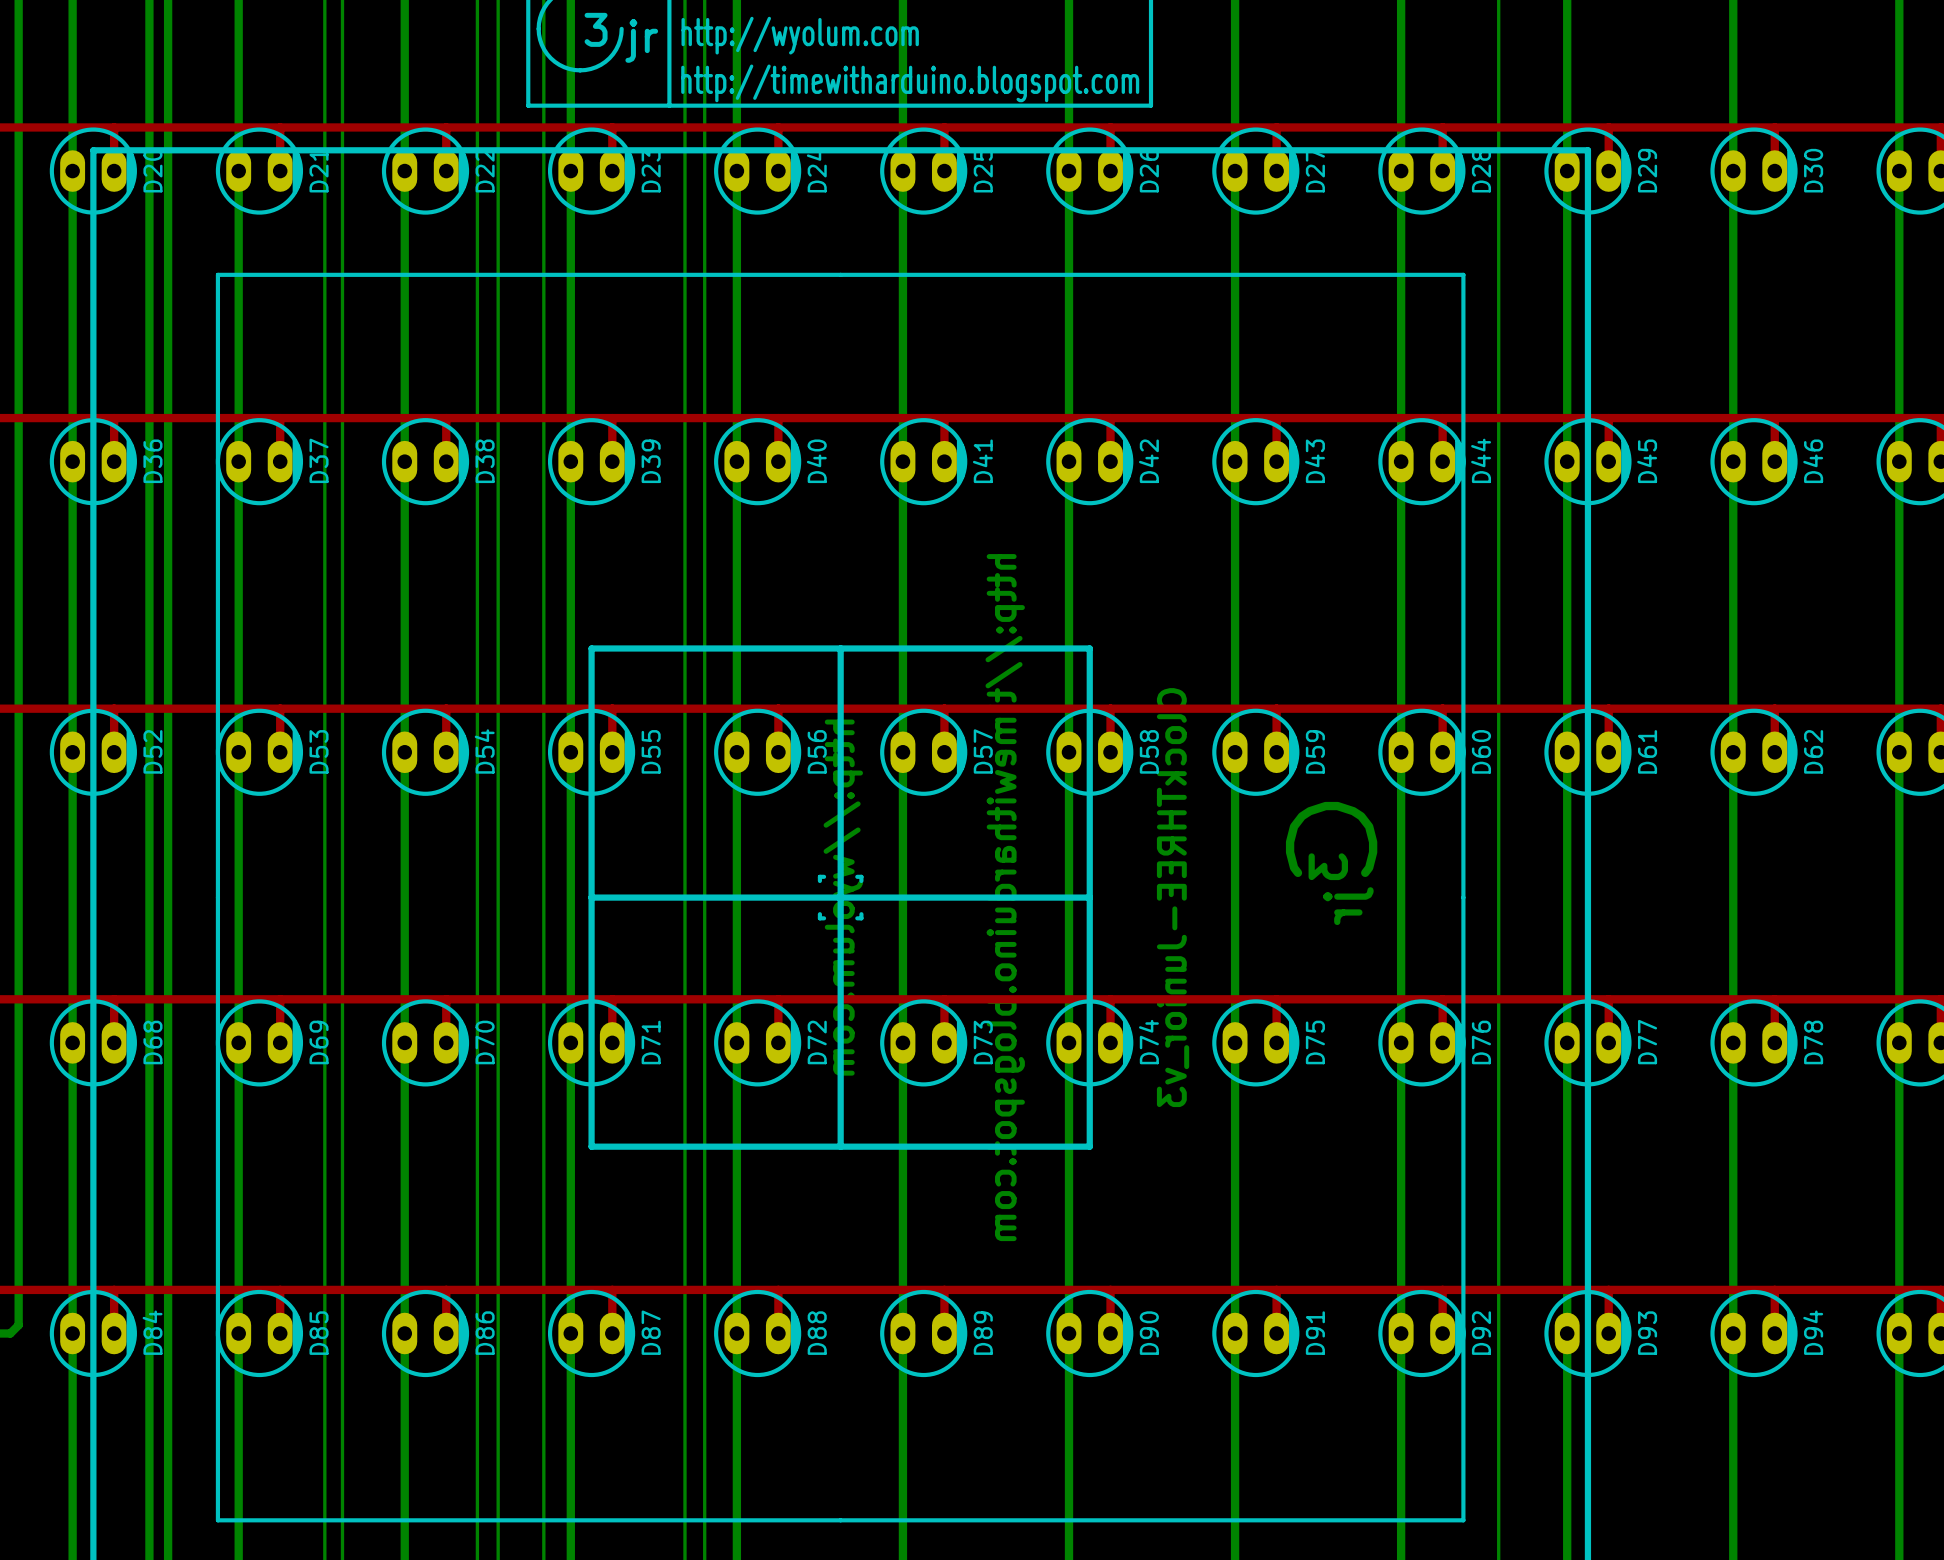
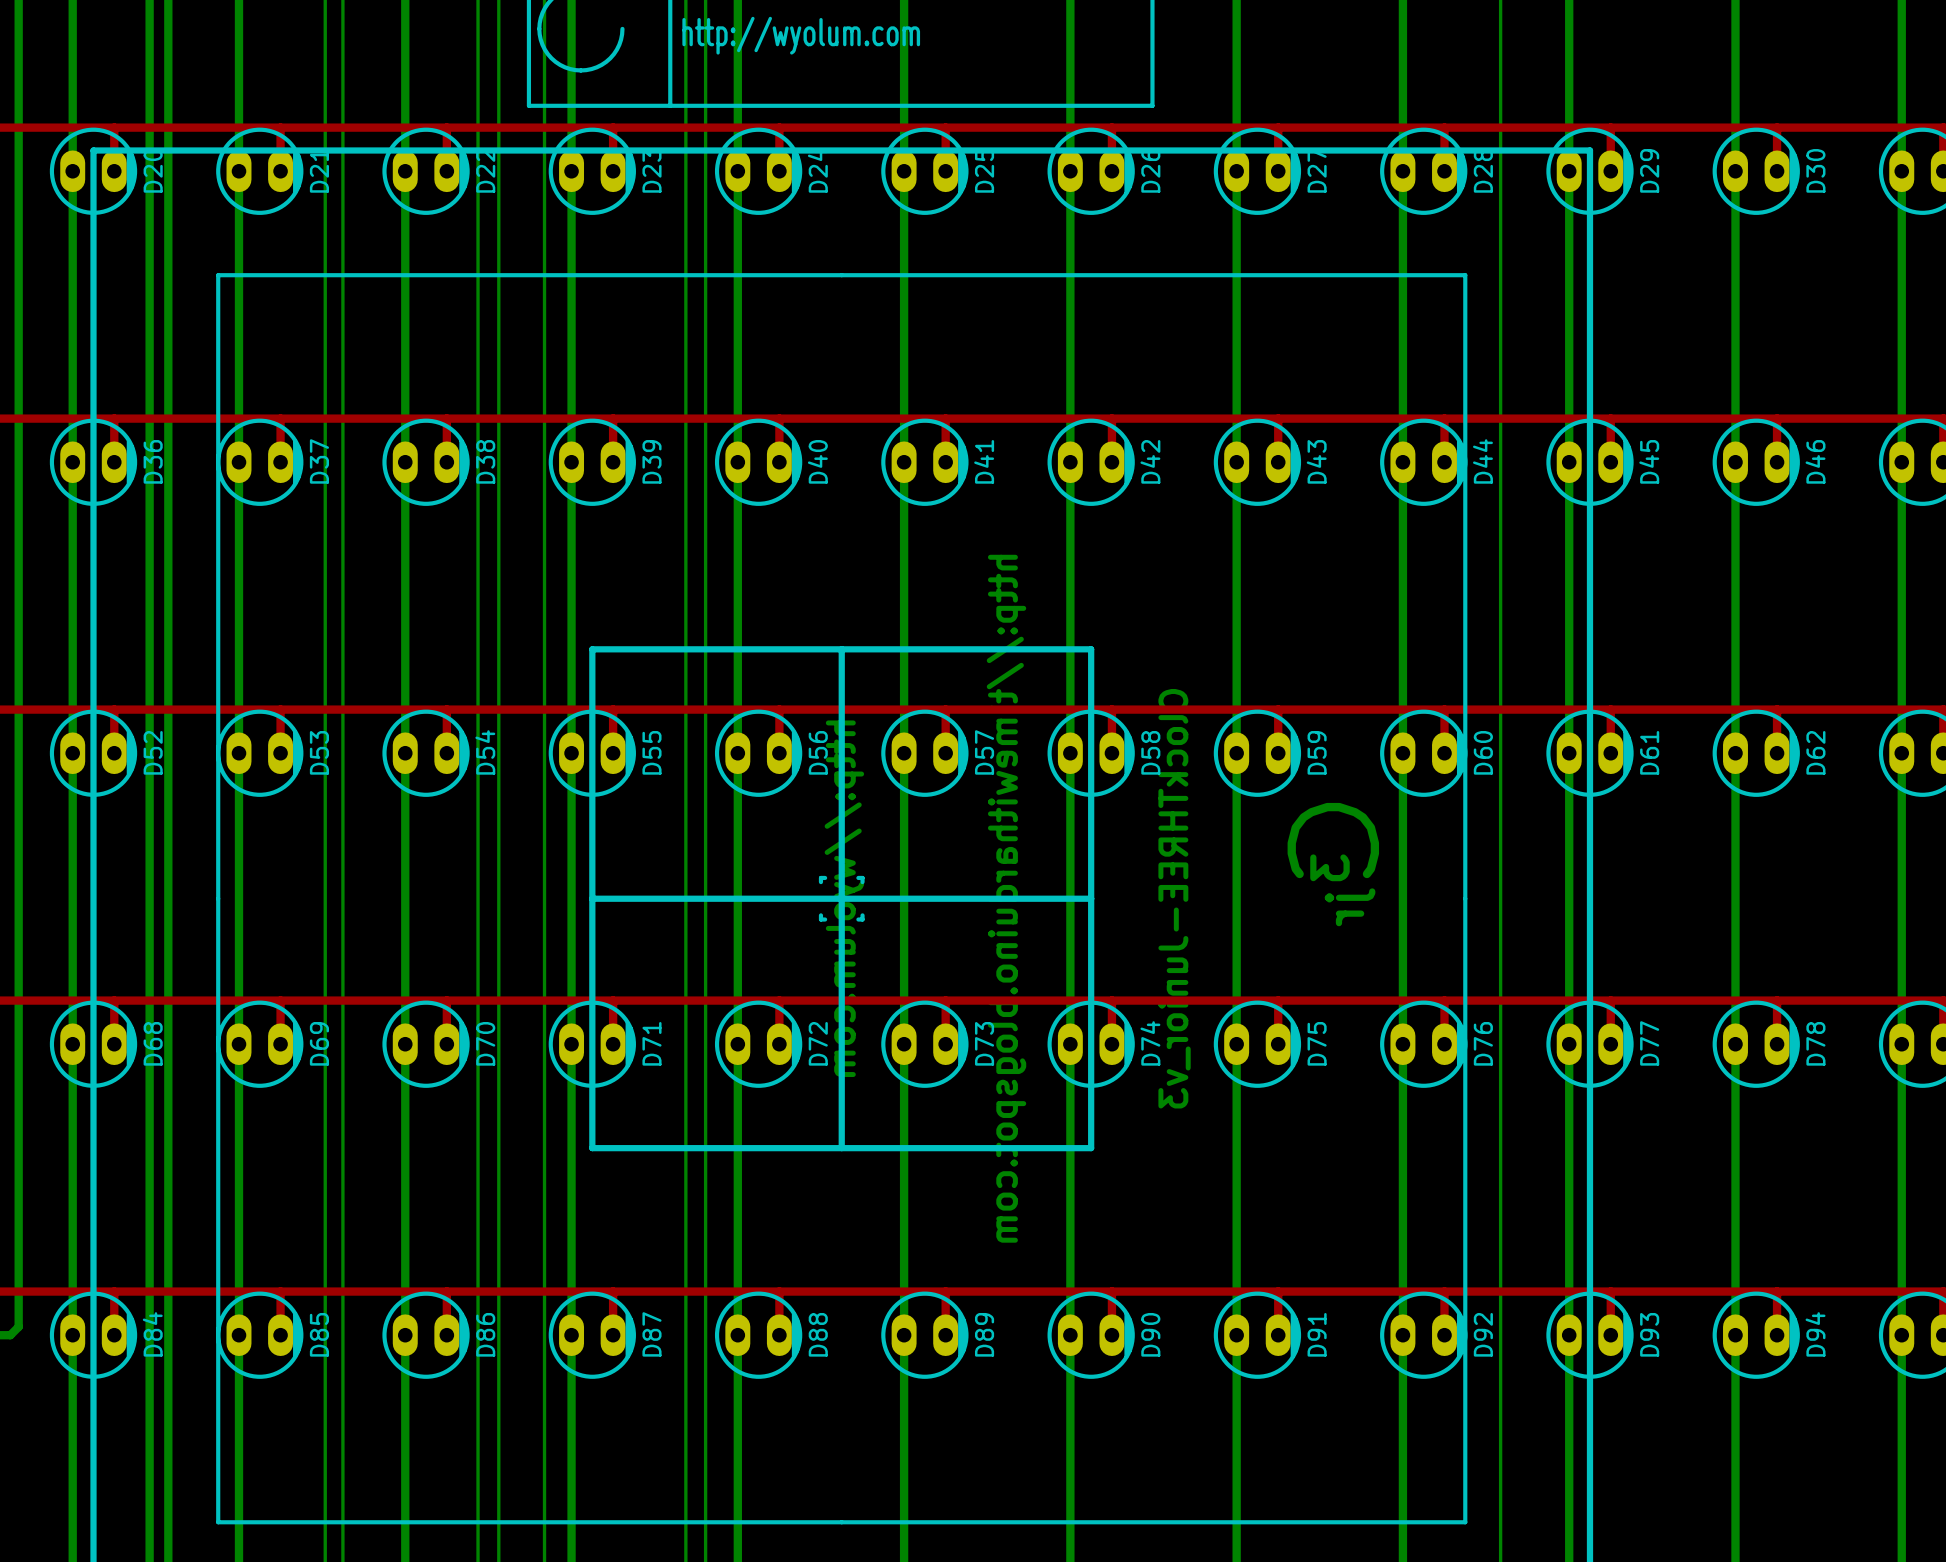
text: 3 (596, 29) -> none
text: jr (641, 40) -> none
text: http://timewitharduino.blogspot.com (910, 83) -> none

